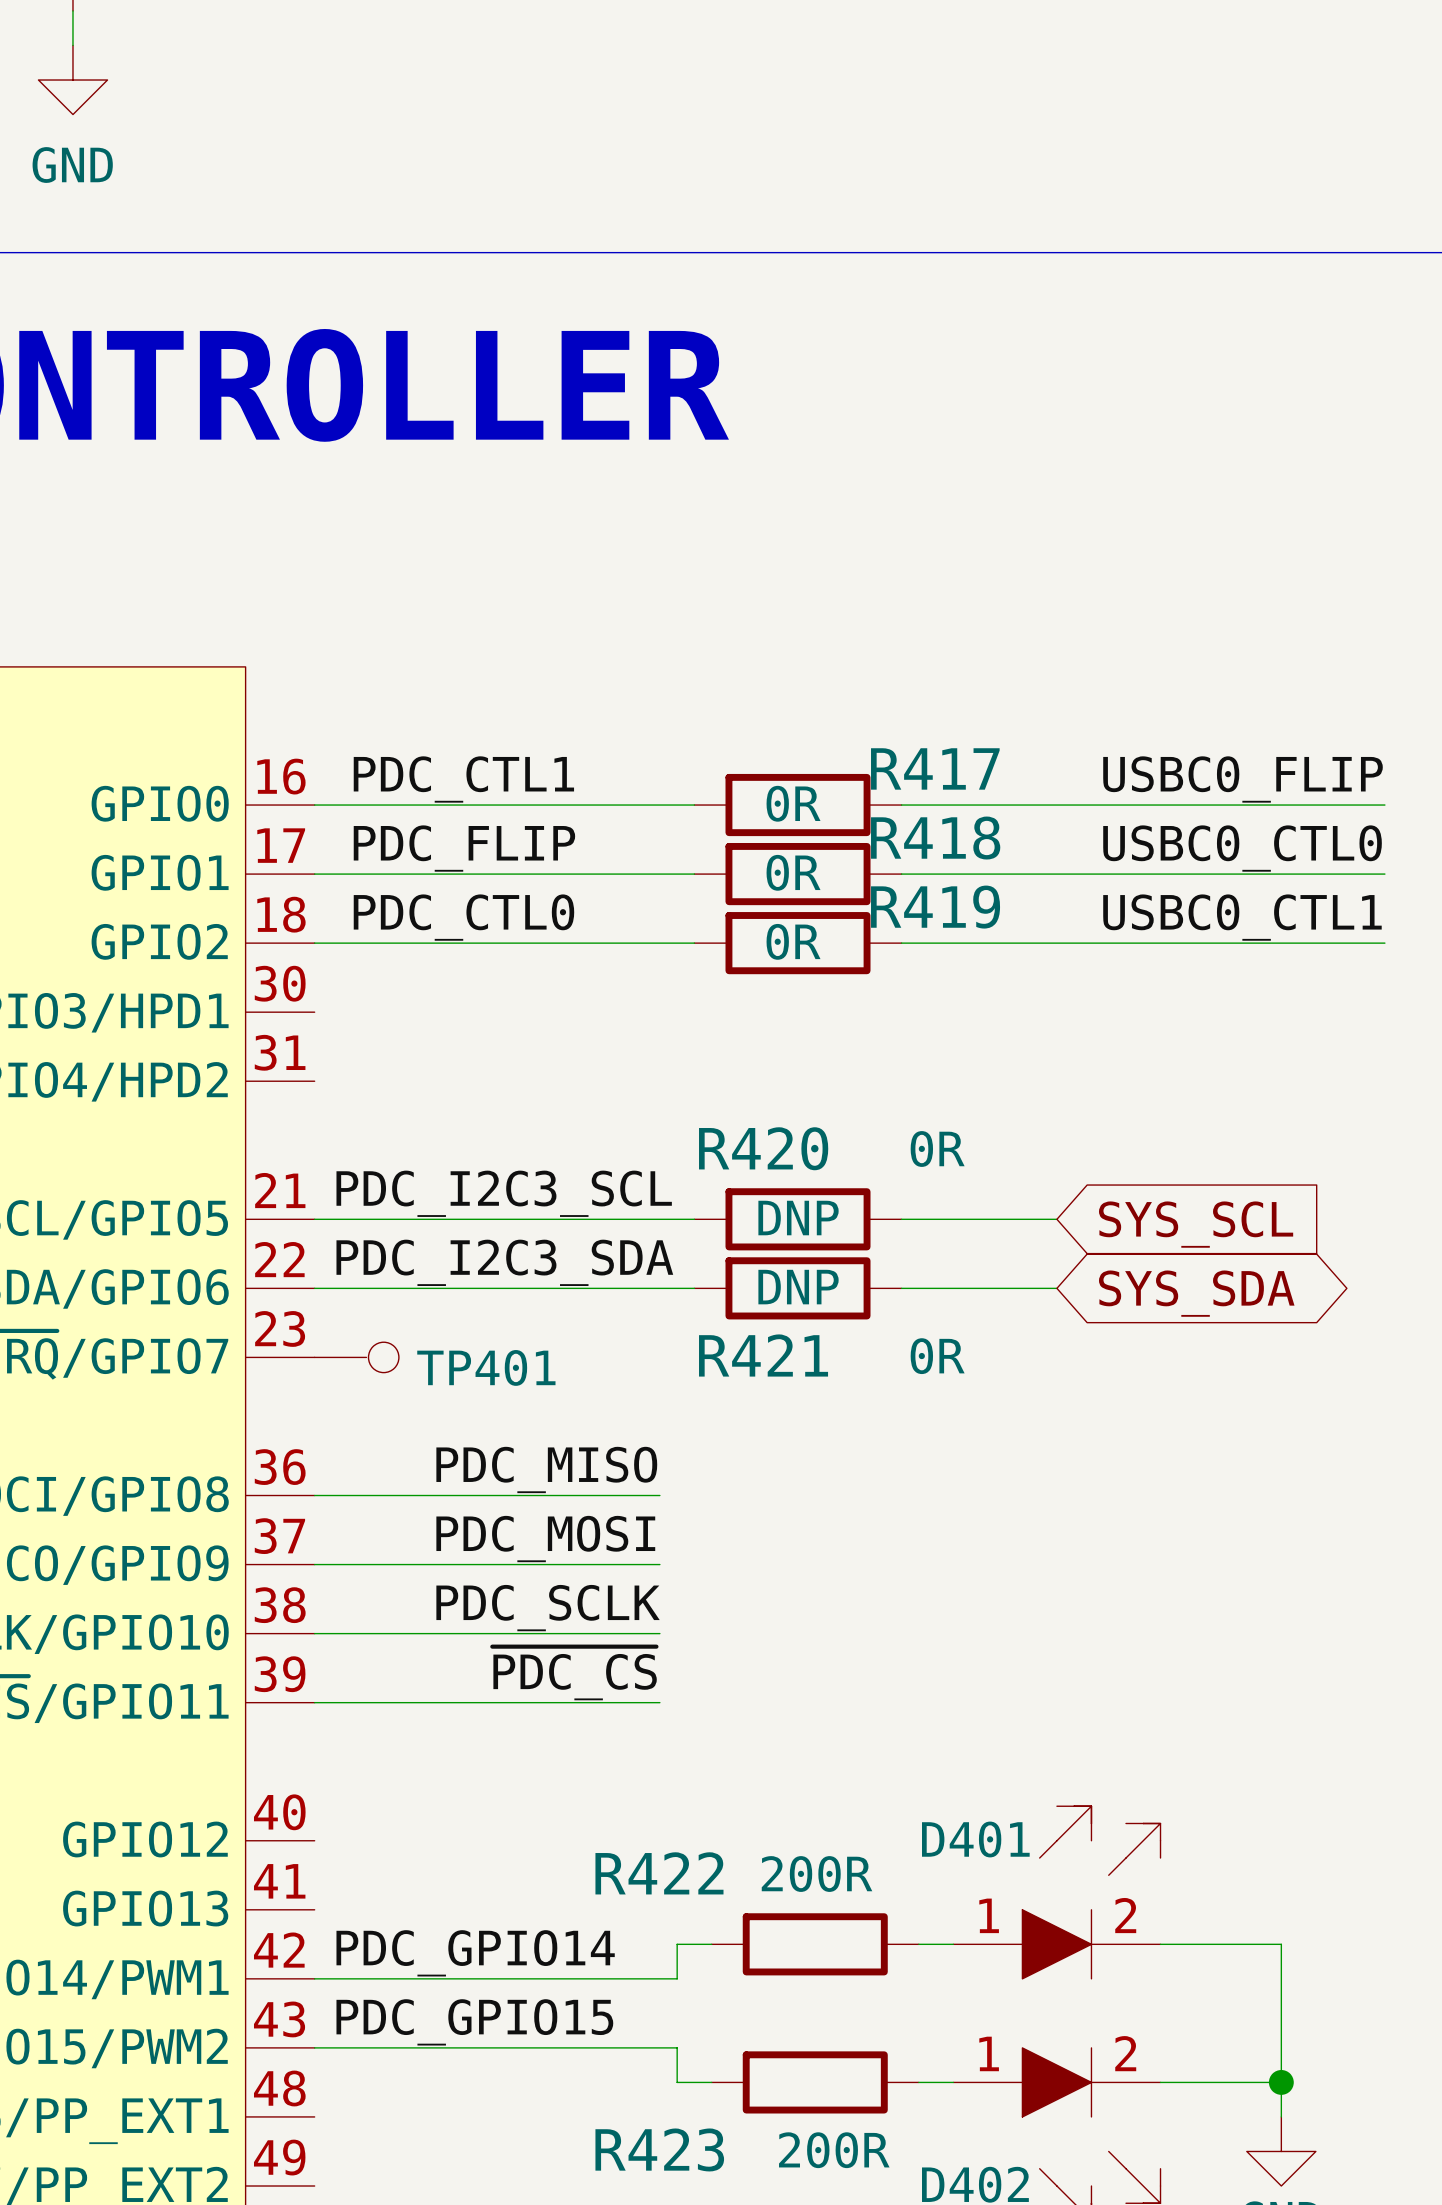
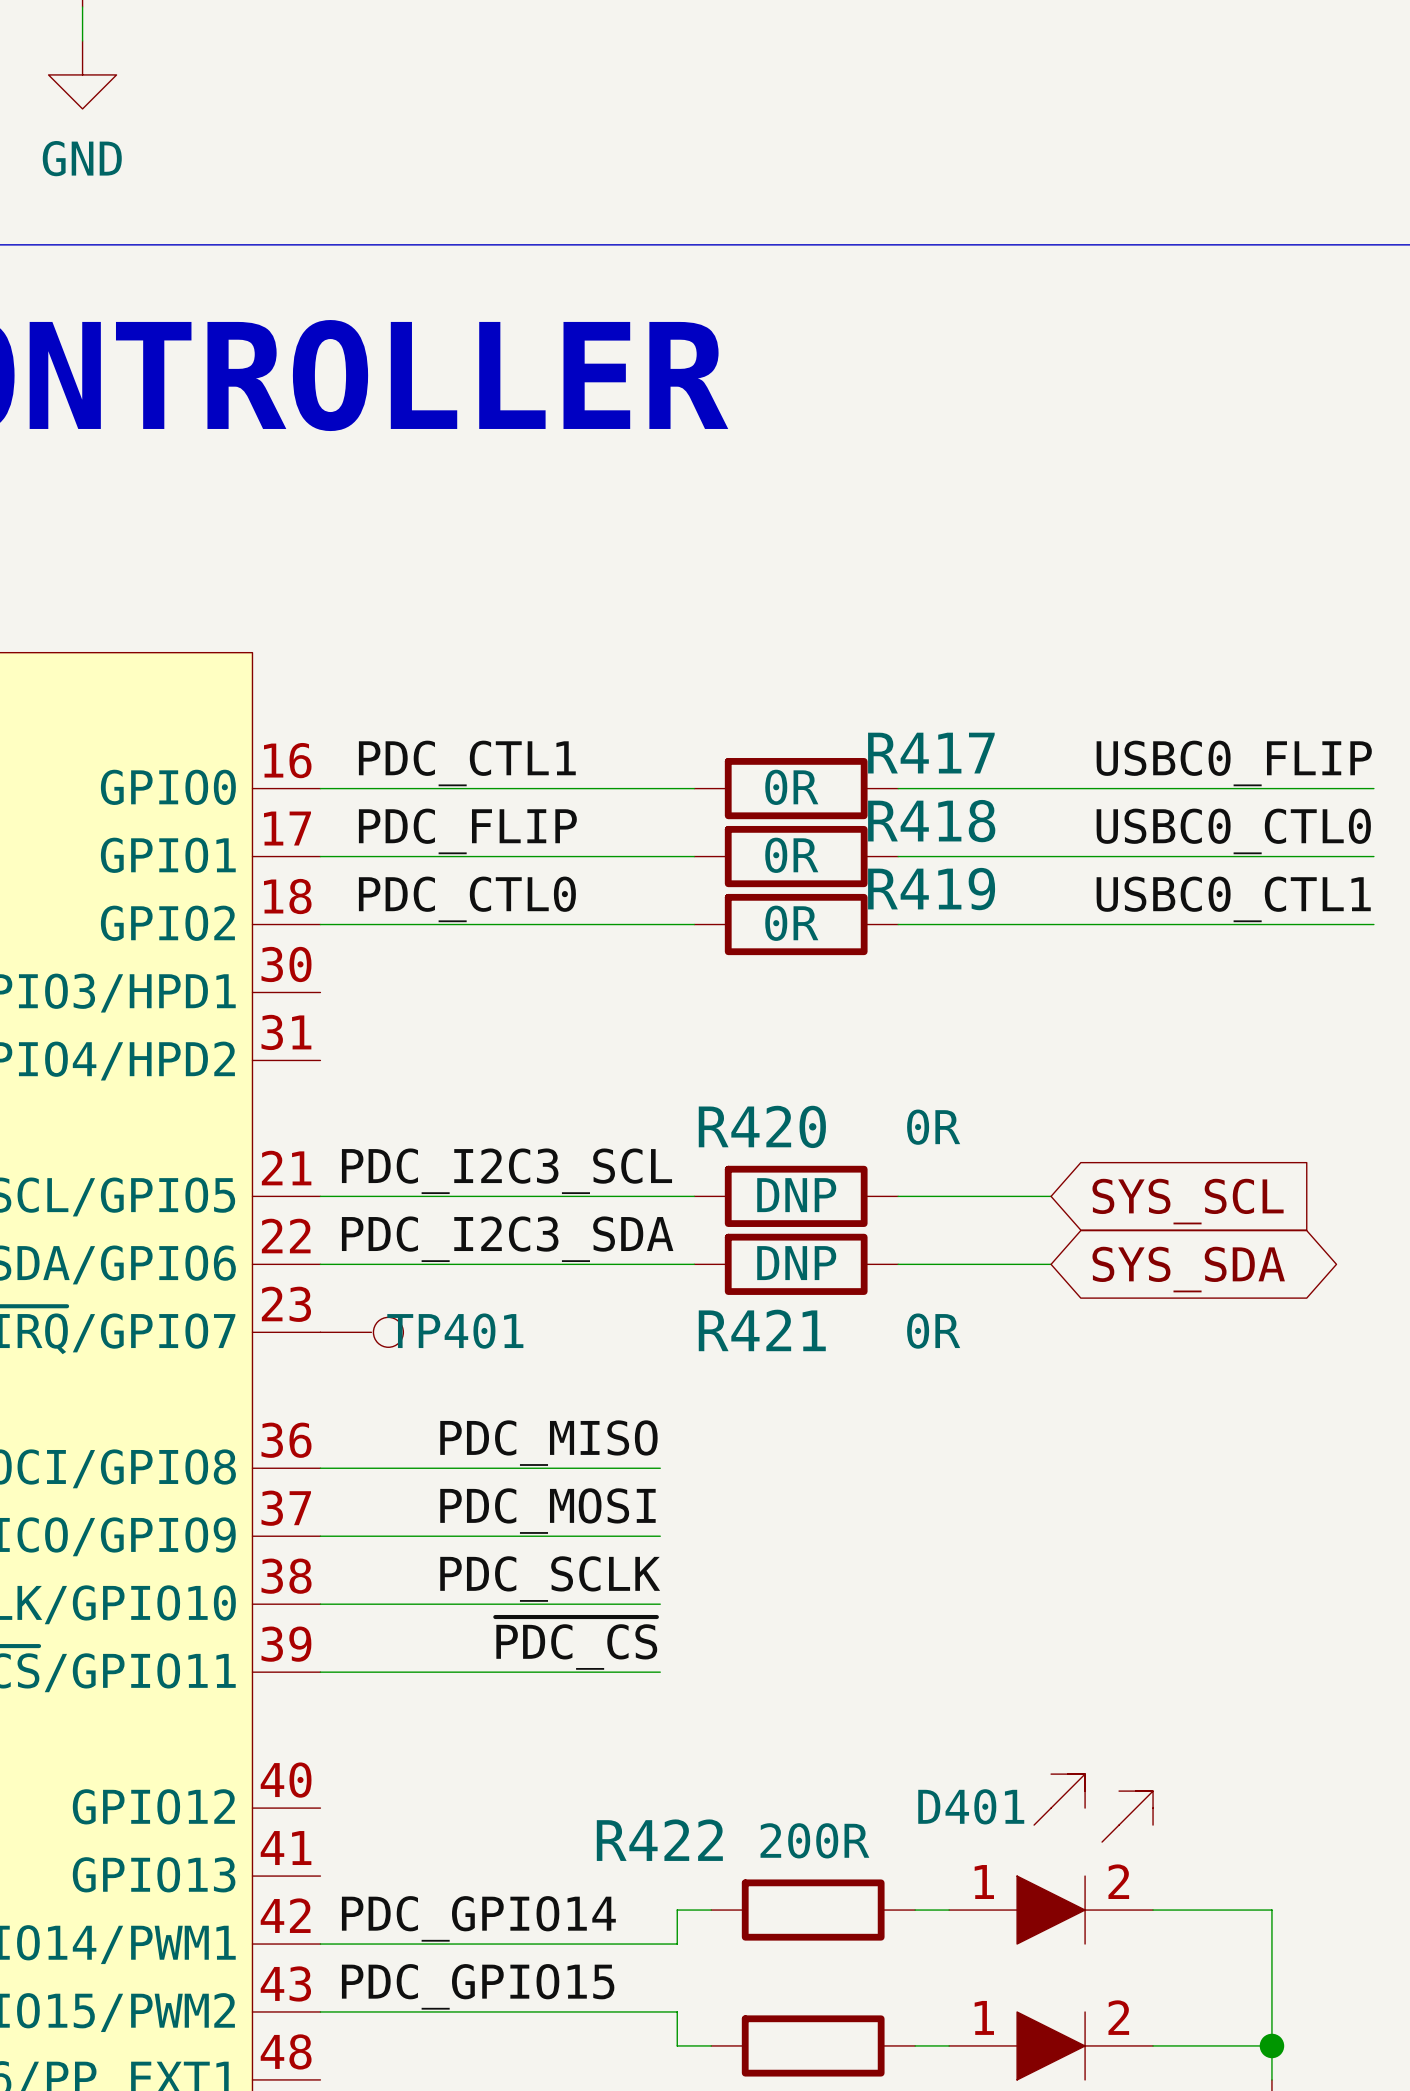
TP401 name position: TP401 (486, 1367) -> TP401 (455, 1331)

